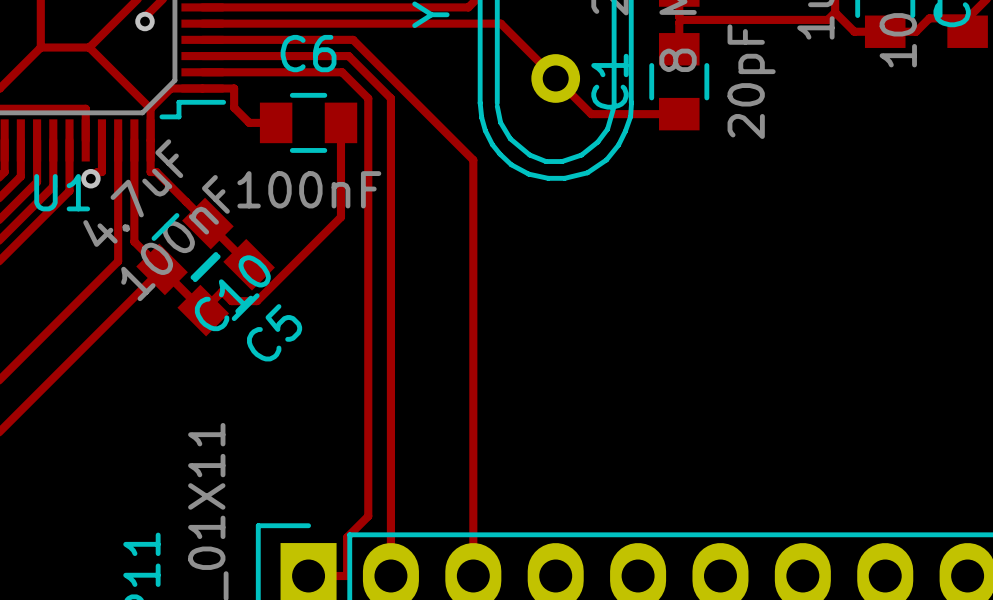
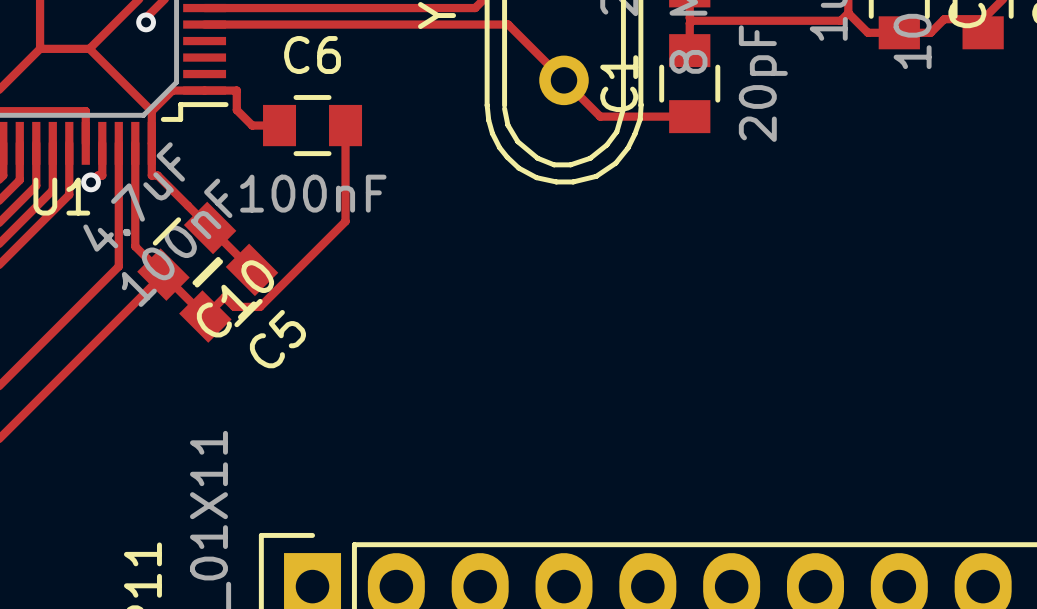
track: (202, 39) (353, 39) (473, 160) (473, 575) -> none
track: (202, 56) (348, 56) (390, 98) (390, 575) -> none
track: (202, 72) (342, 72) (368, 98) (368, 516) (347, 537) (347, 575) (308, 575) -> none

